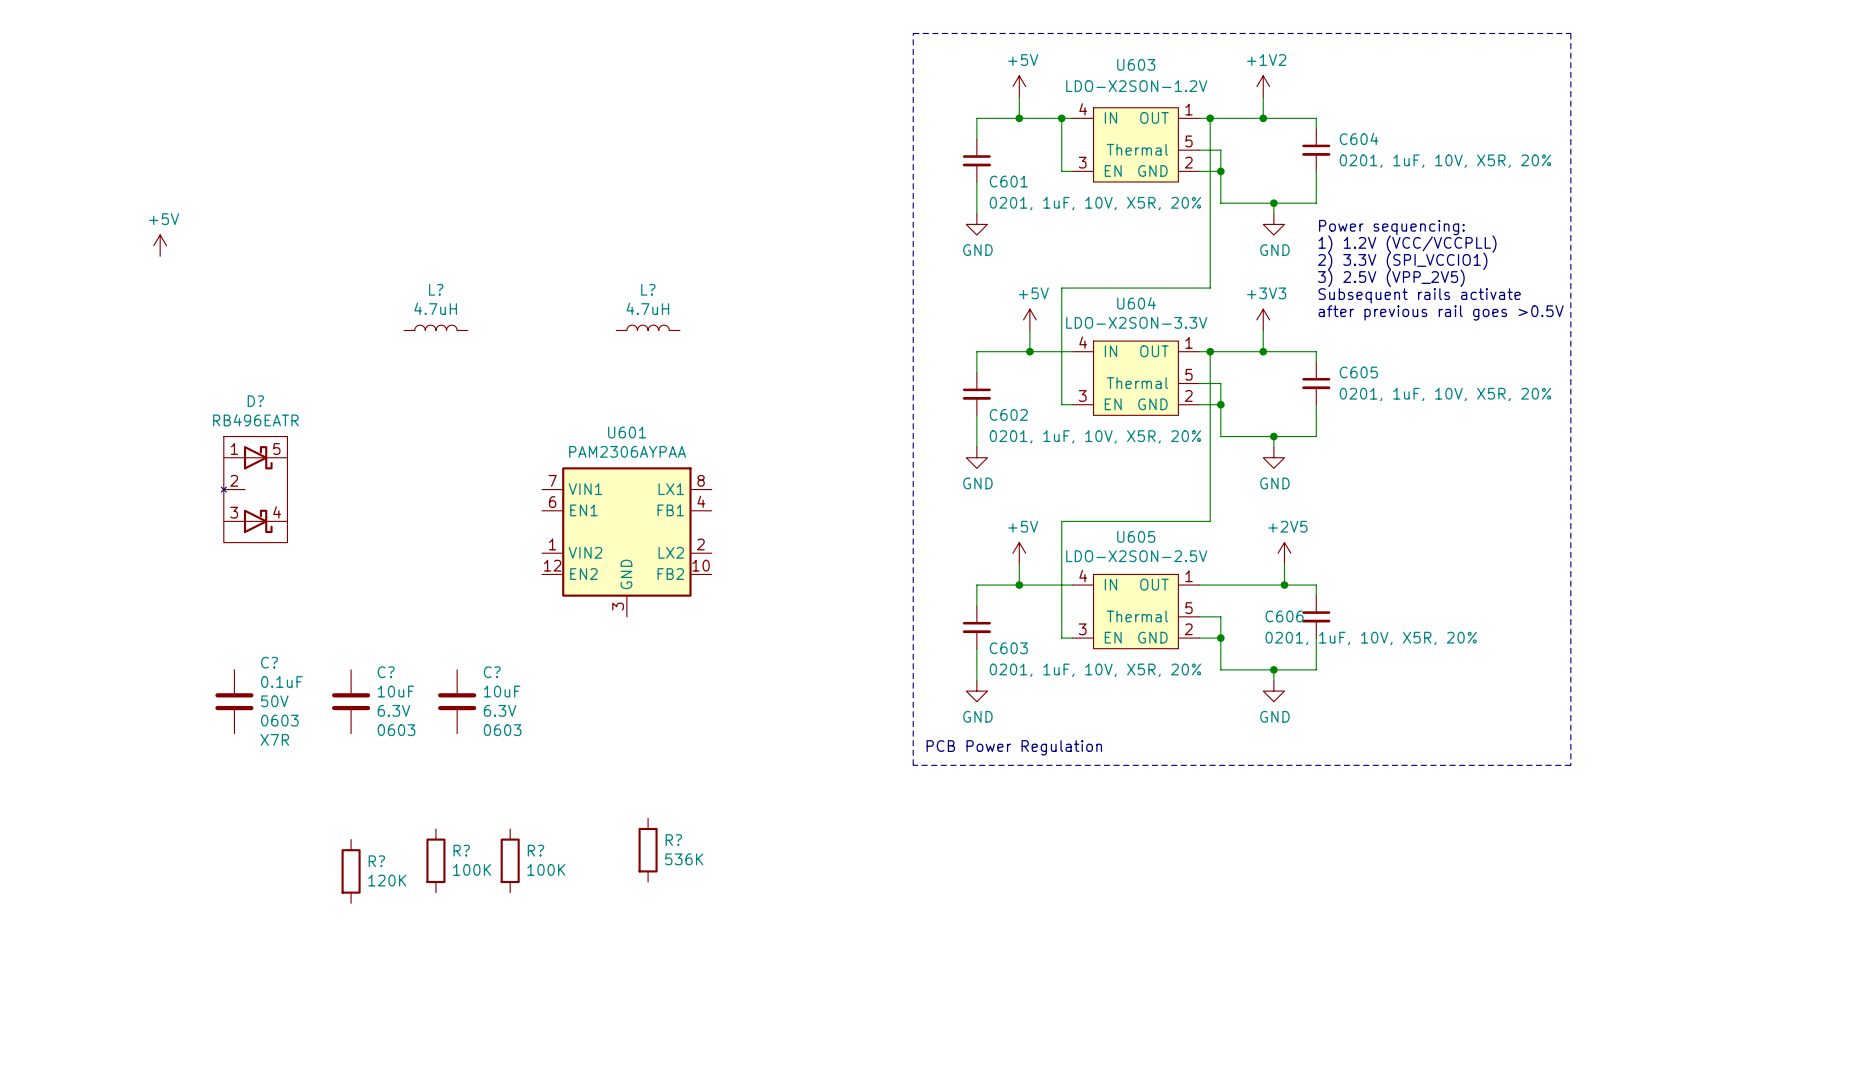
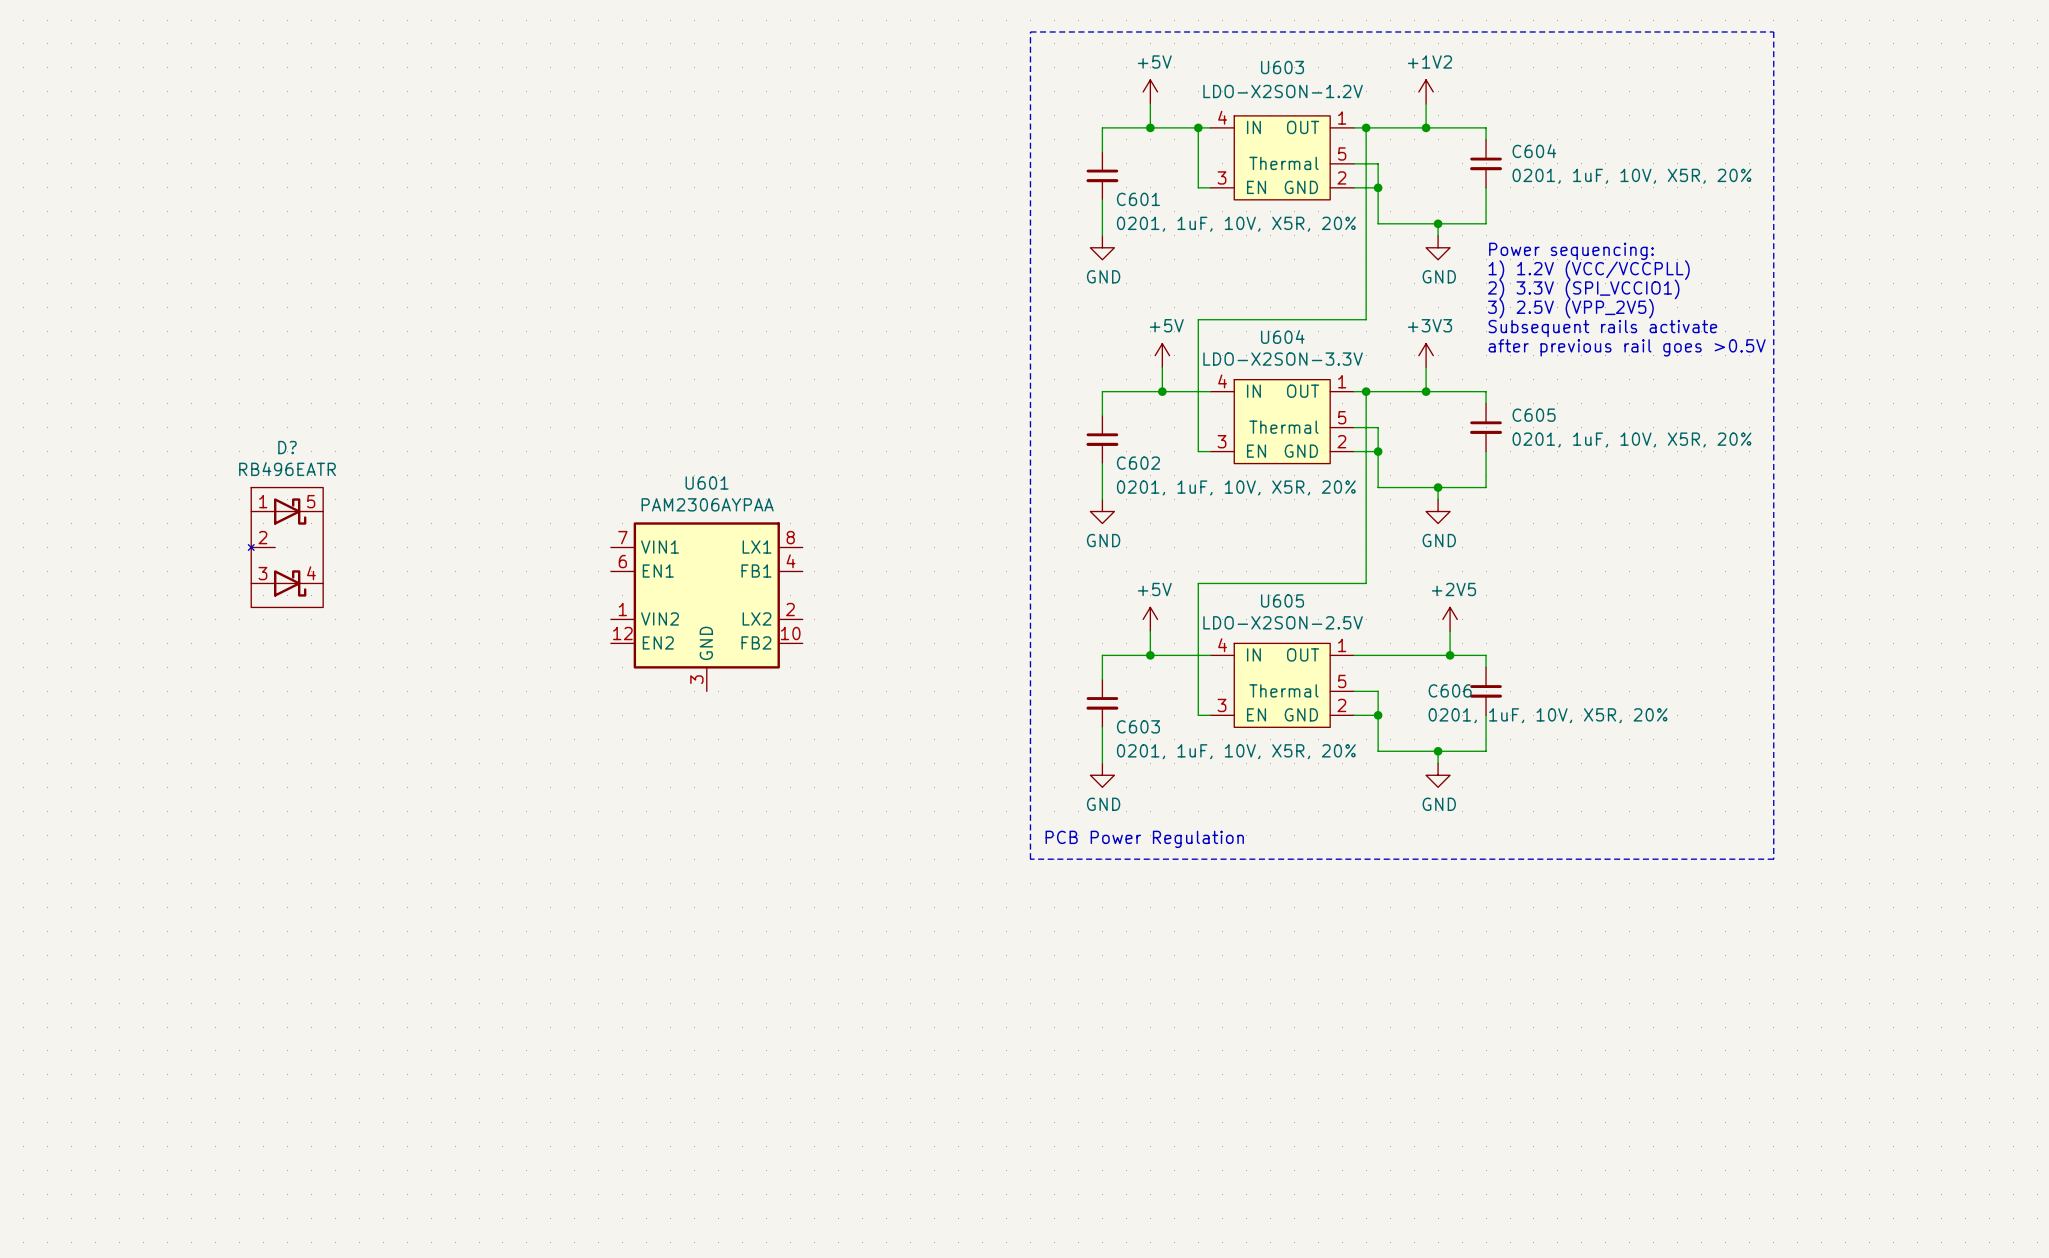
power symbol: +5V (160, 245) -> none
L?: 4.7uH (435, 327) -> none
L?: 4.7uH (648, 327) -> none
C?: 0.1uF (234, 701) -> none
C?: 10uF (351, 701) -> none
C?: 10uF (457, 701) -> none
R?: 536K (648, 850) -> none
R?: 100K (435, 860) -> none
R?: 100K (510, 860) -> none
R?: 120K (351, 871) -> none

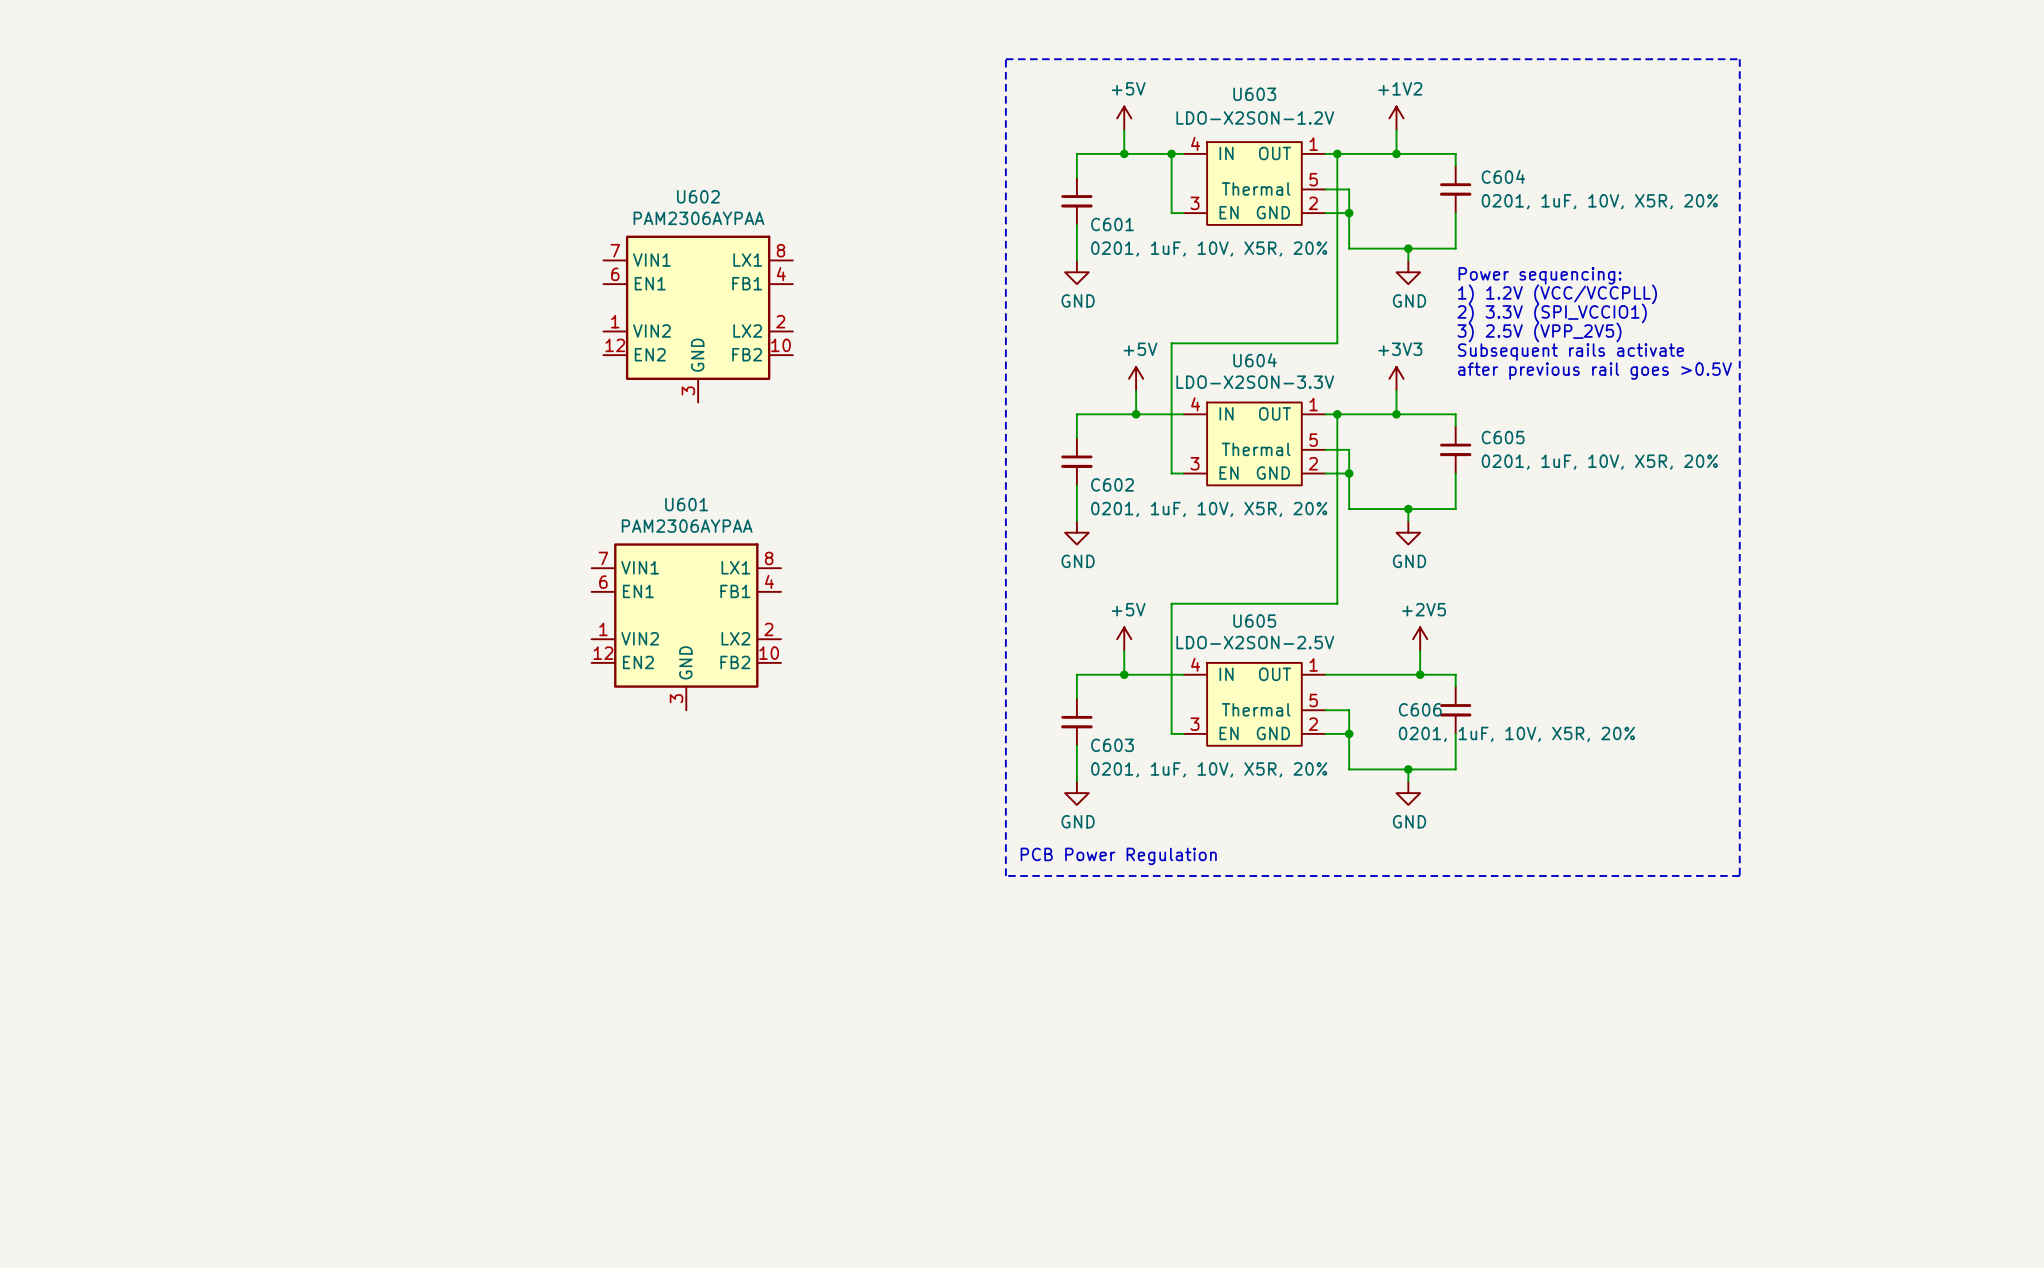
U602: none -> PAM2306AYPAA (698, 319)
D?: RB496EATR (285, 547) -> none

